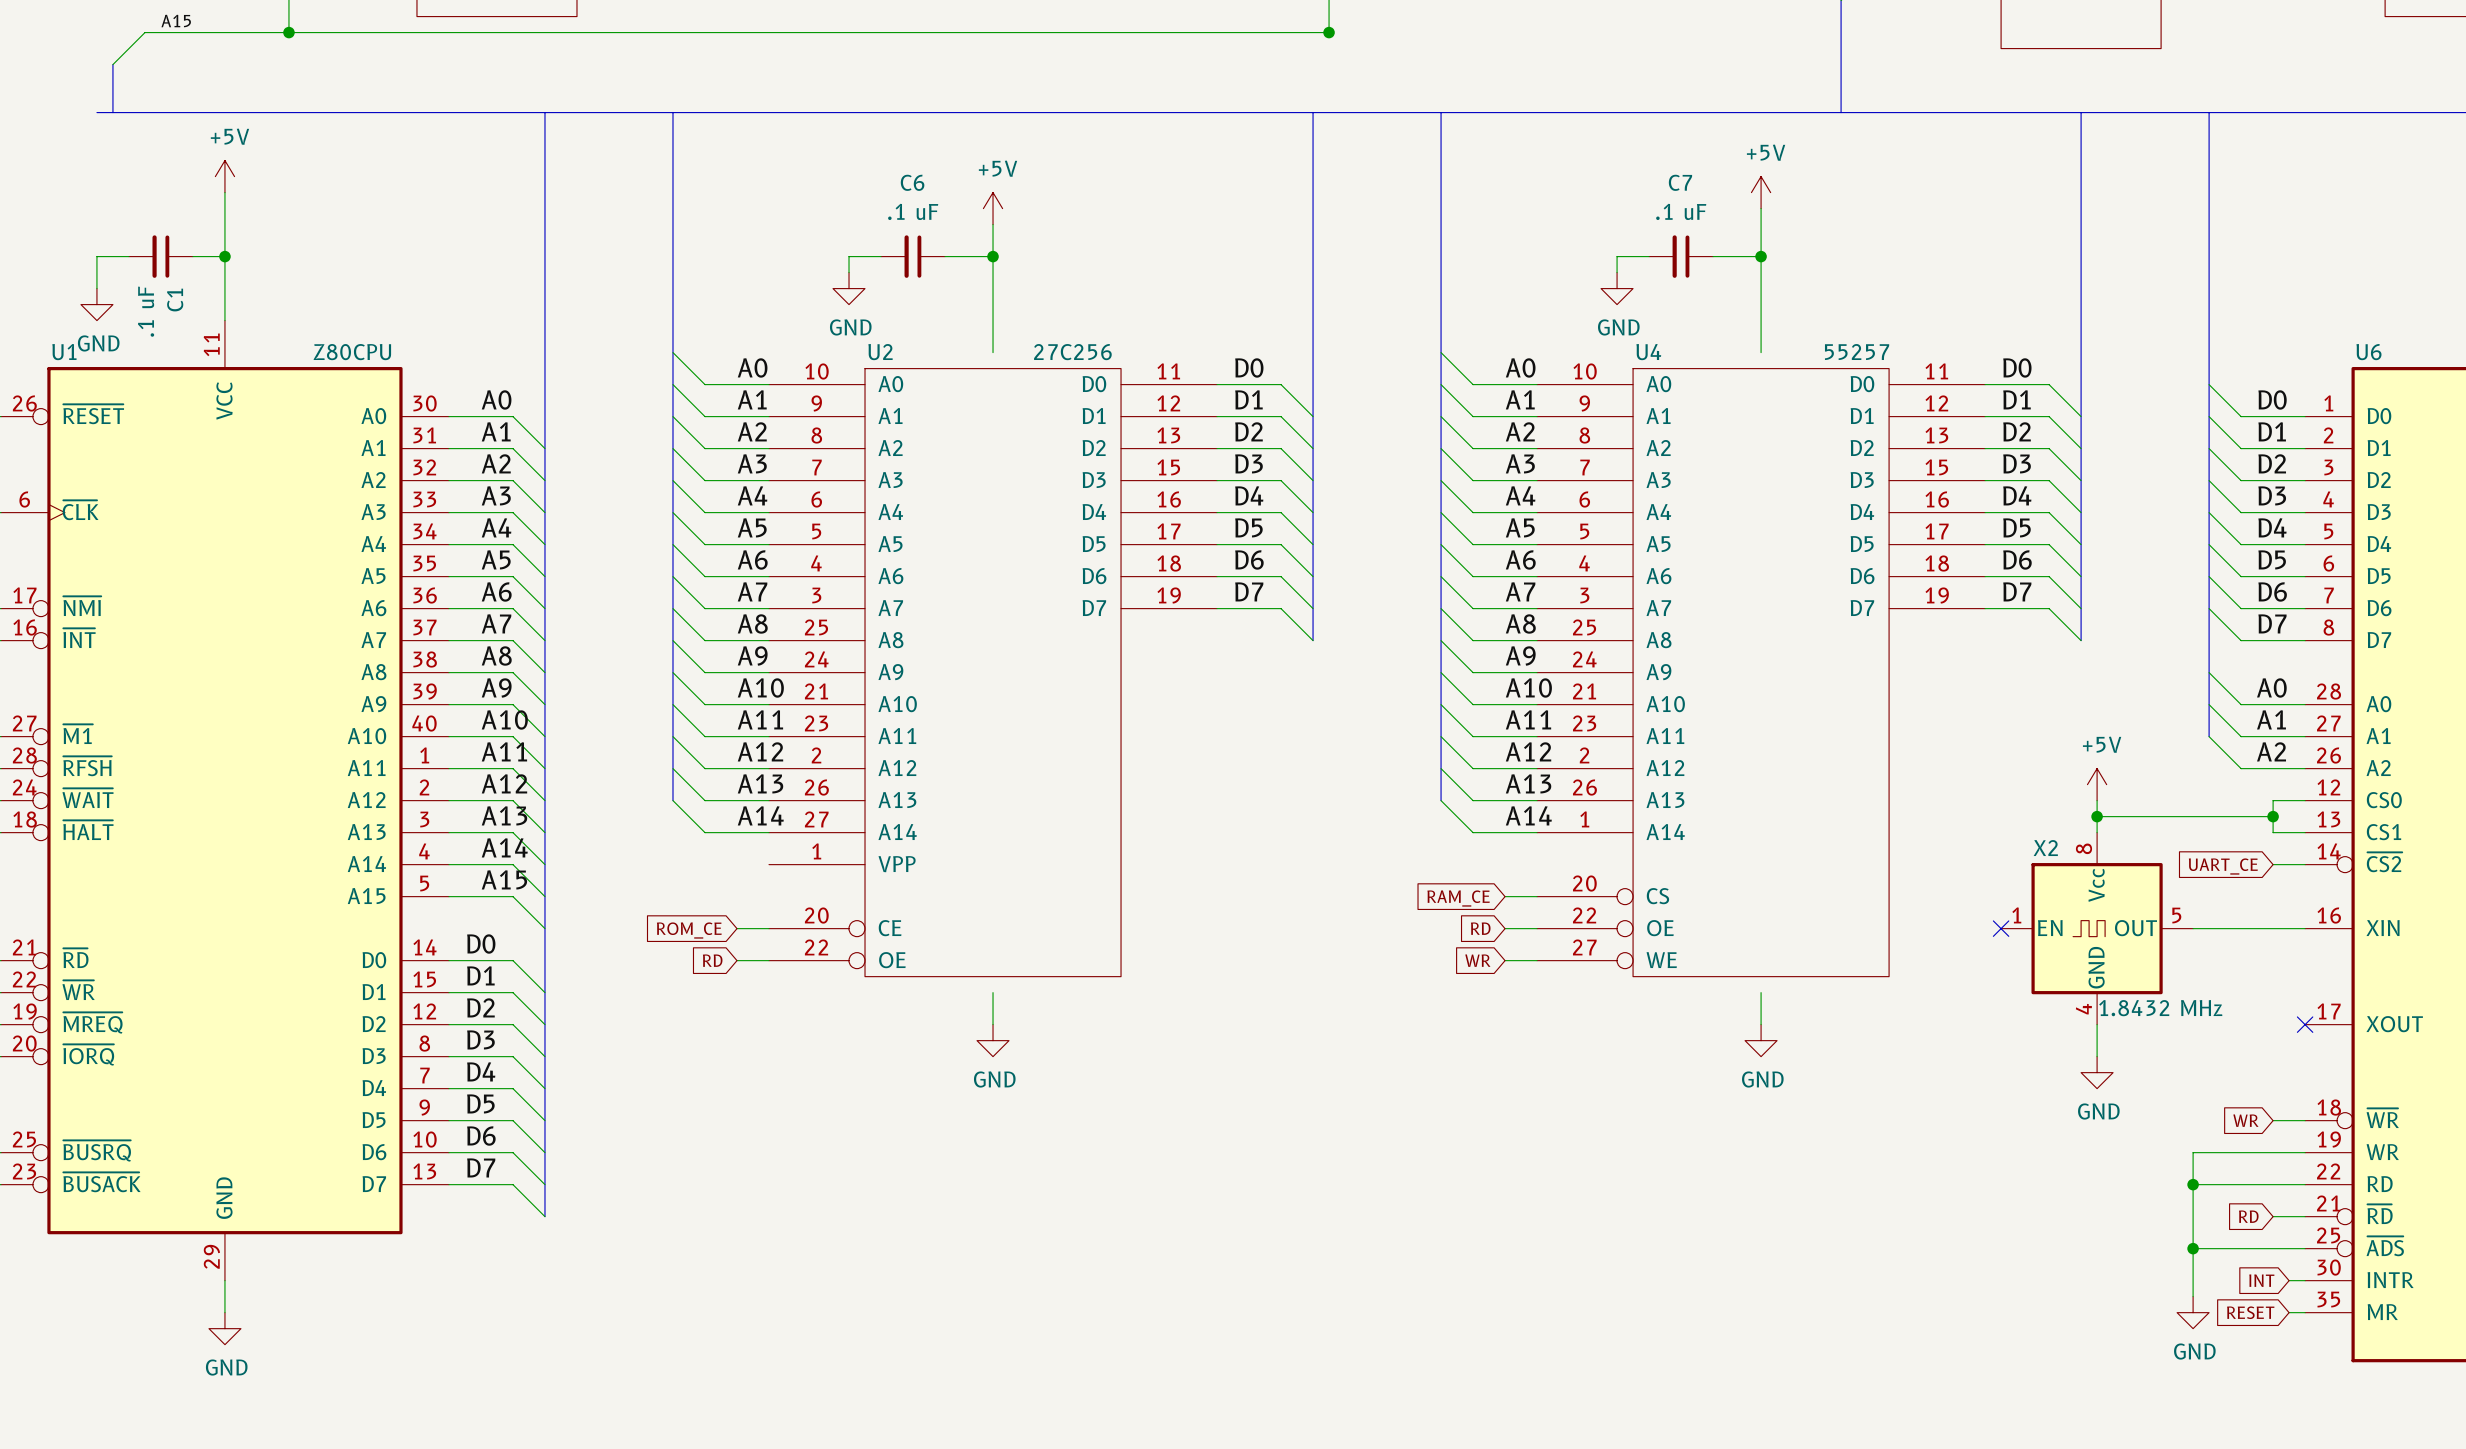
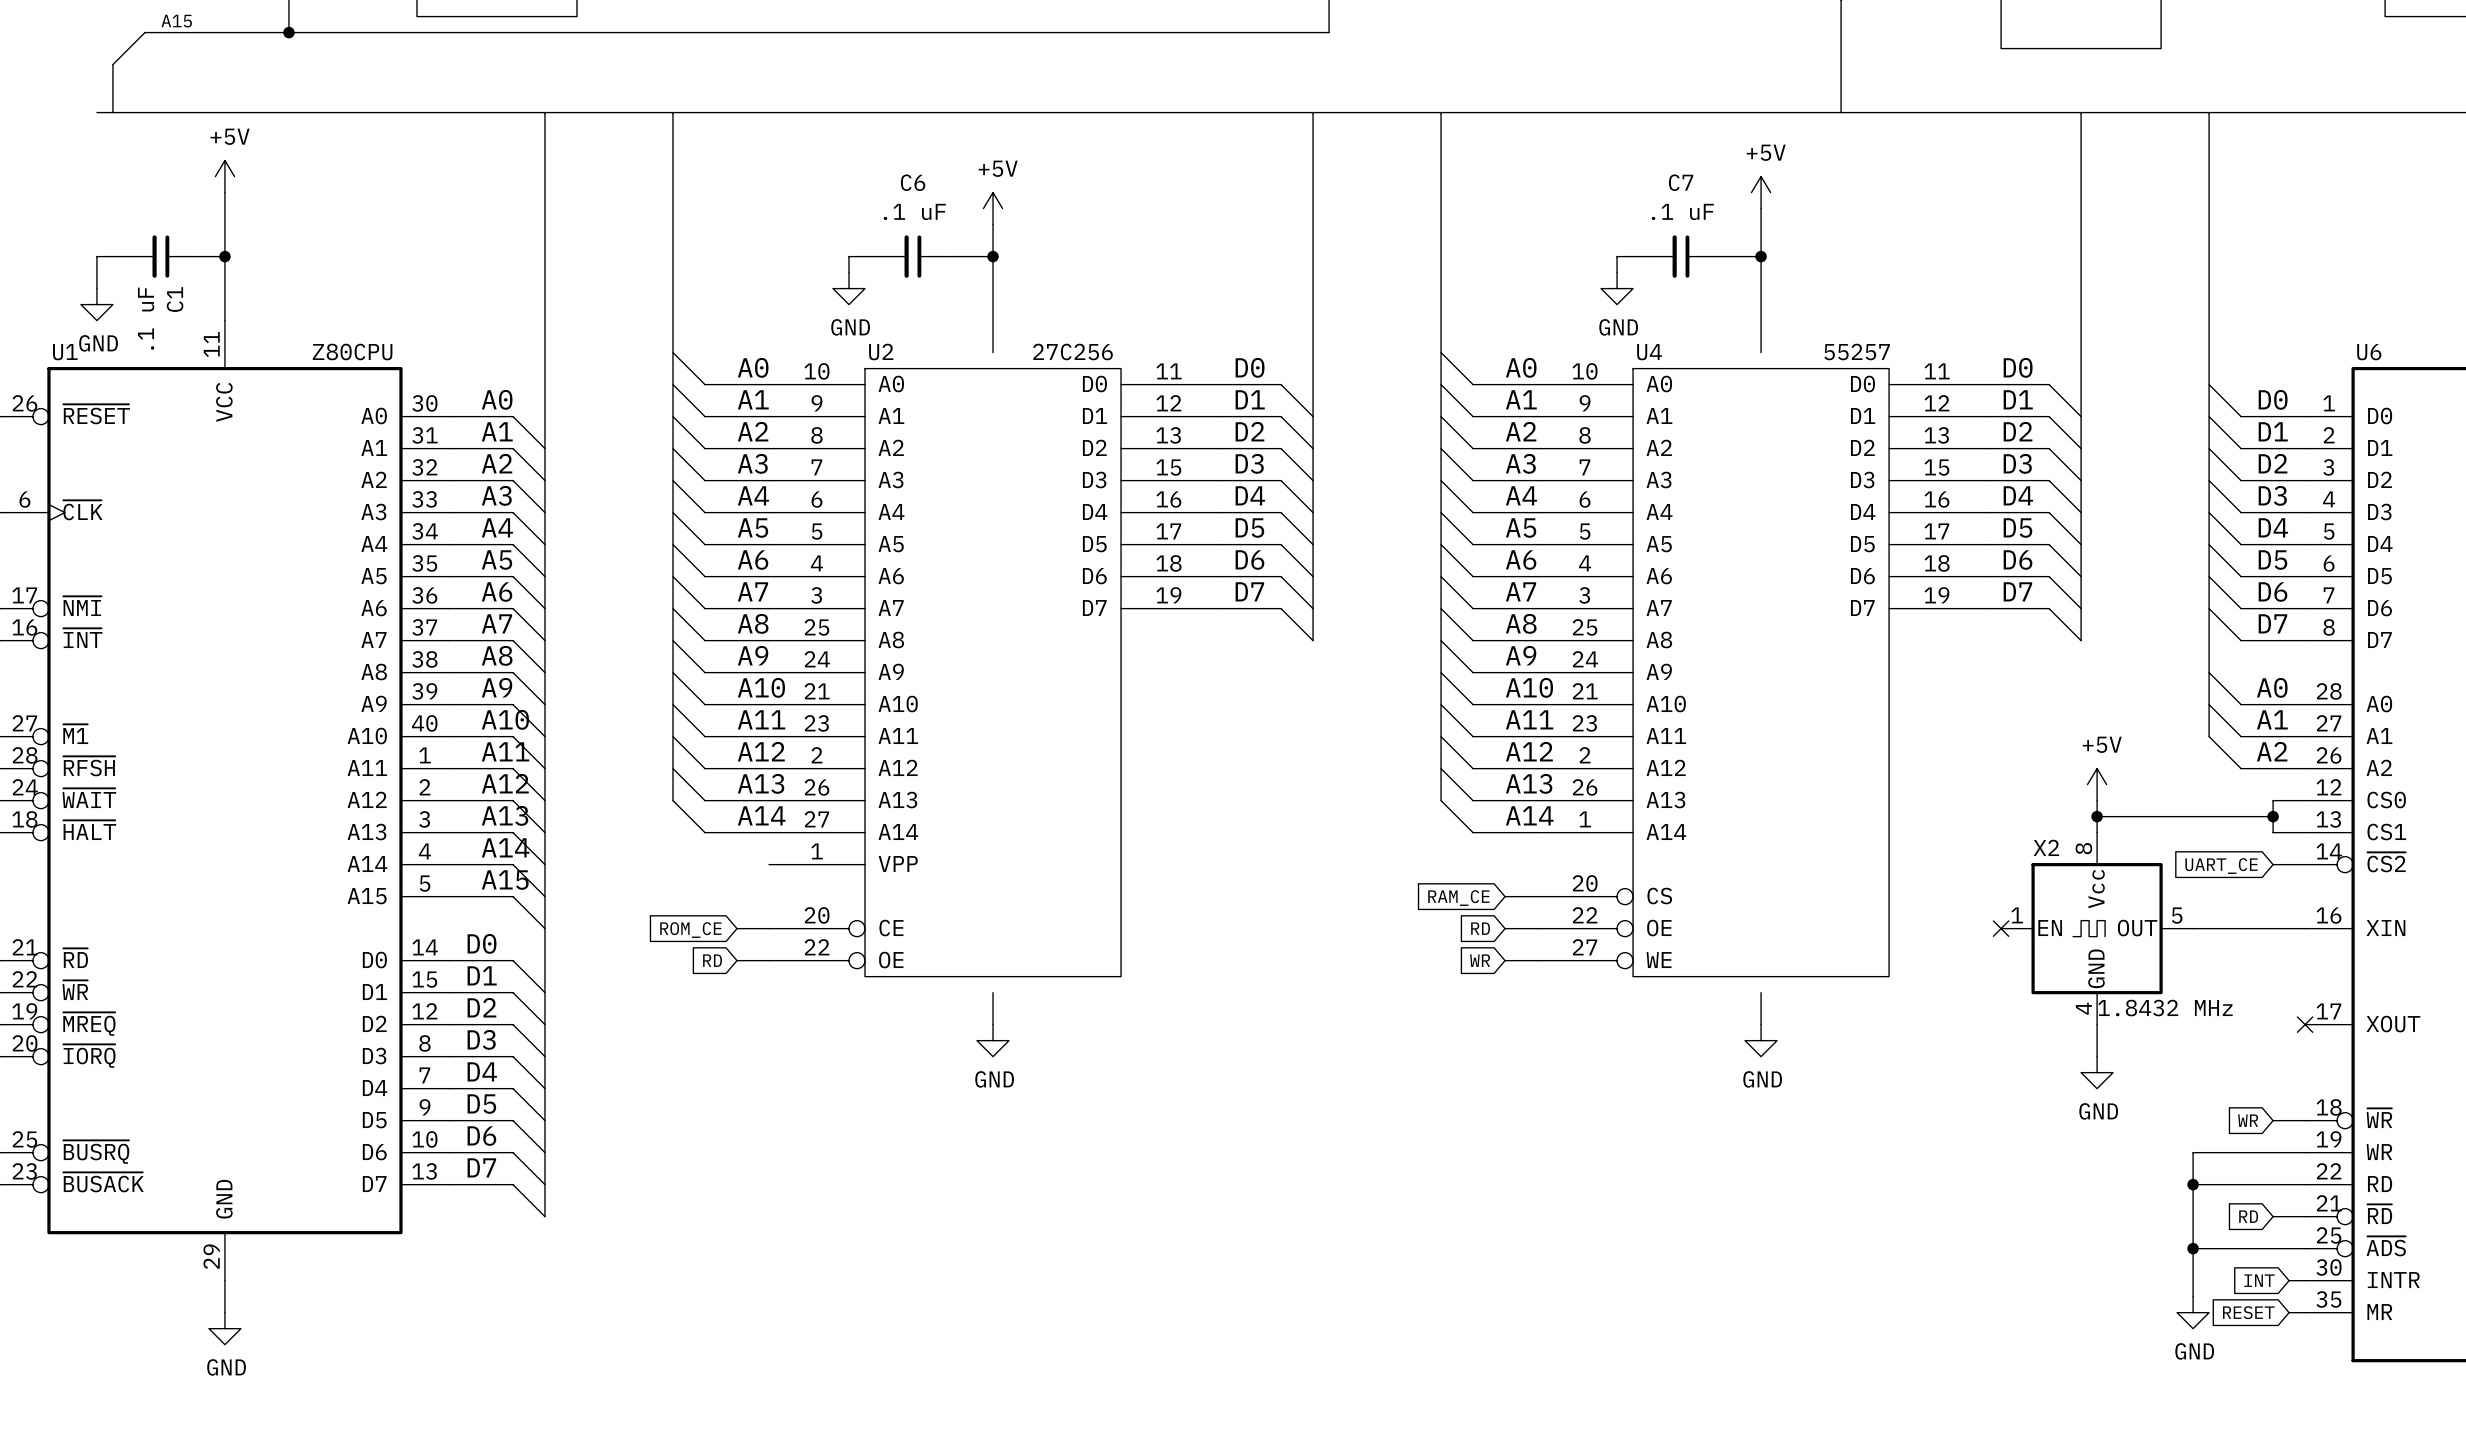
junction: (1329, 32) -> none

